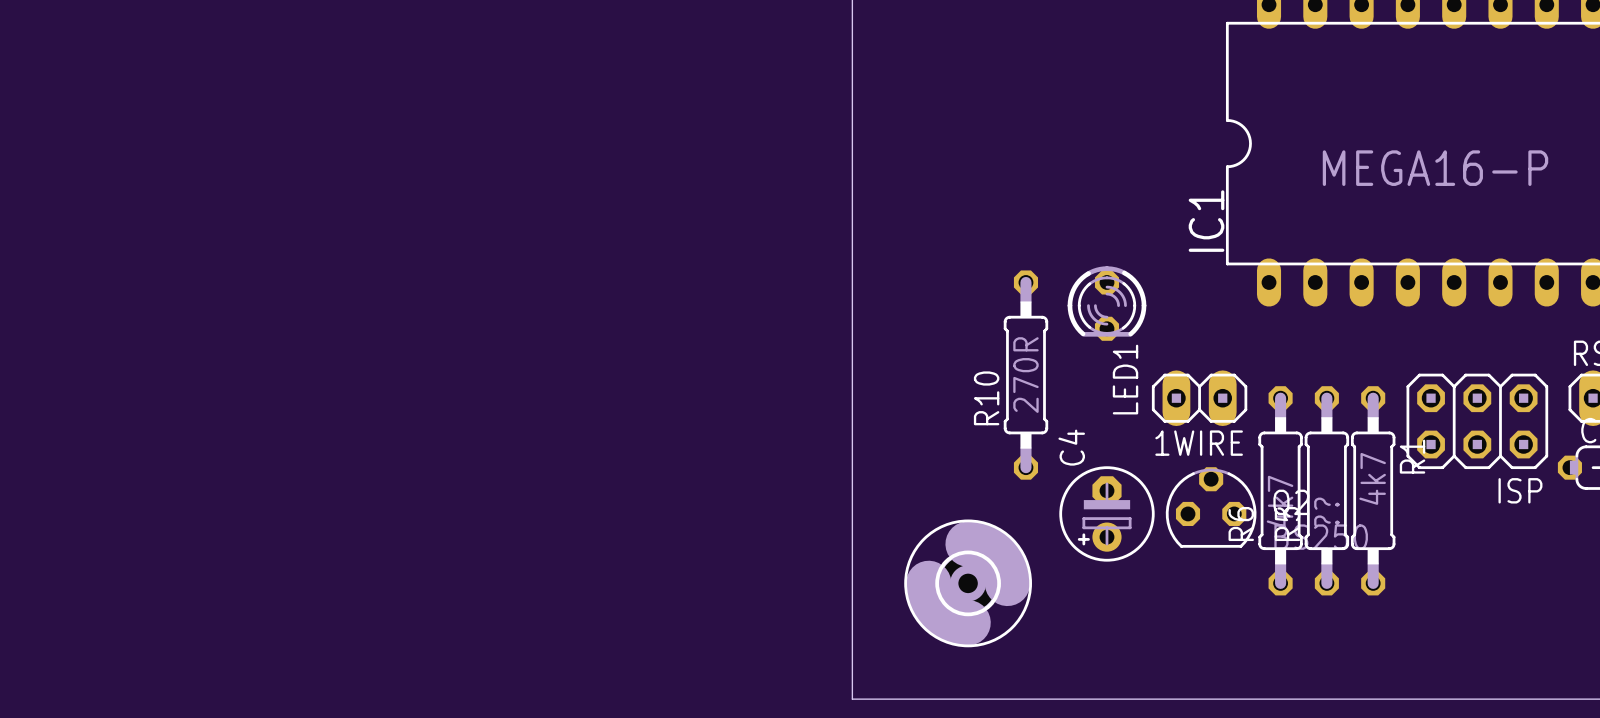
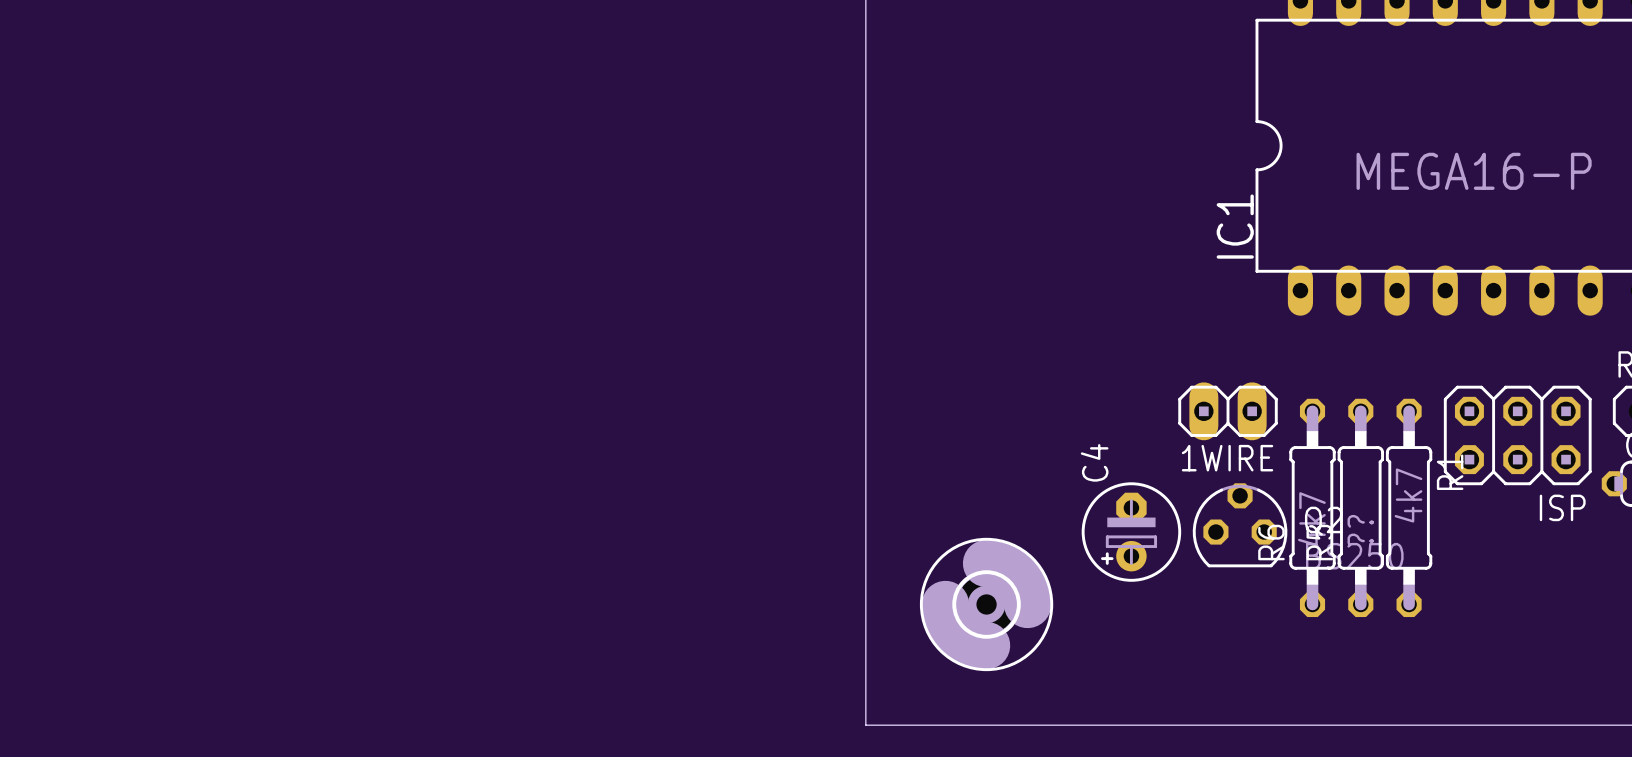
LED1: (1106, 303) -> none
R10: 270R (1025, 375) -> none

